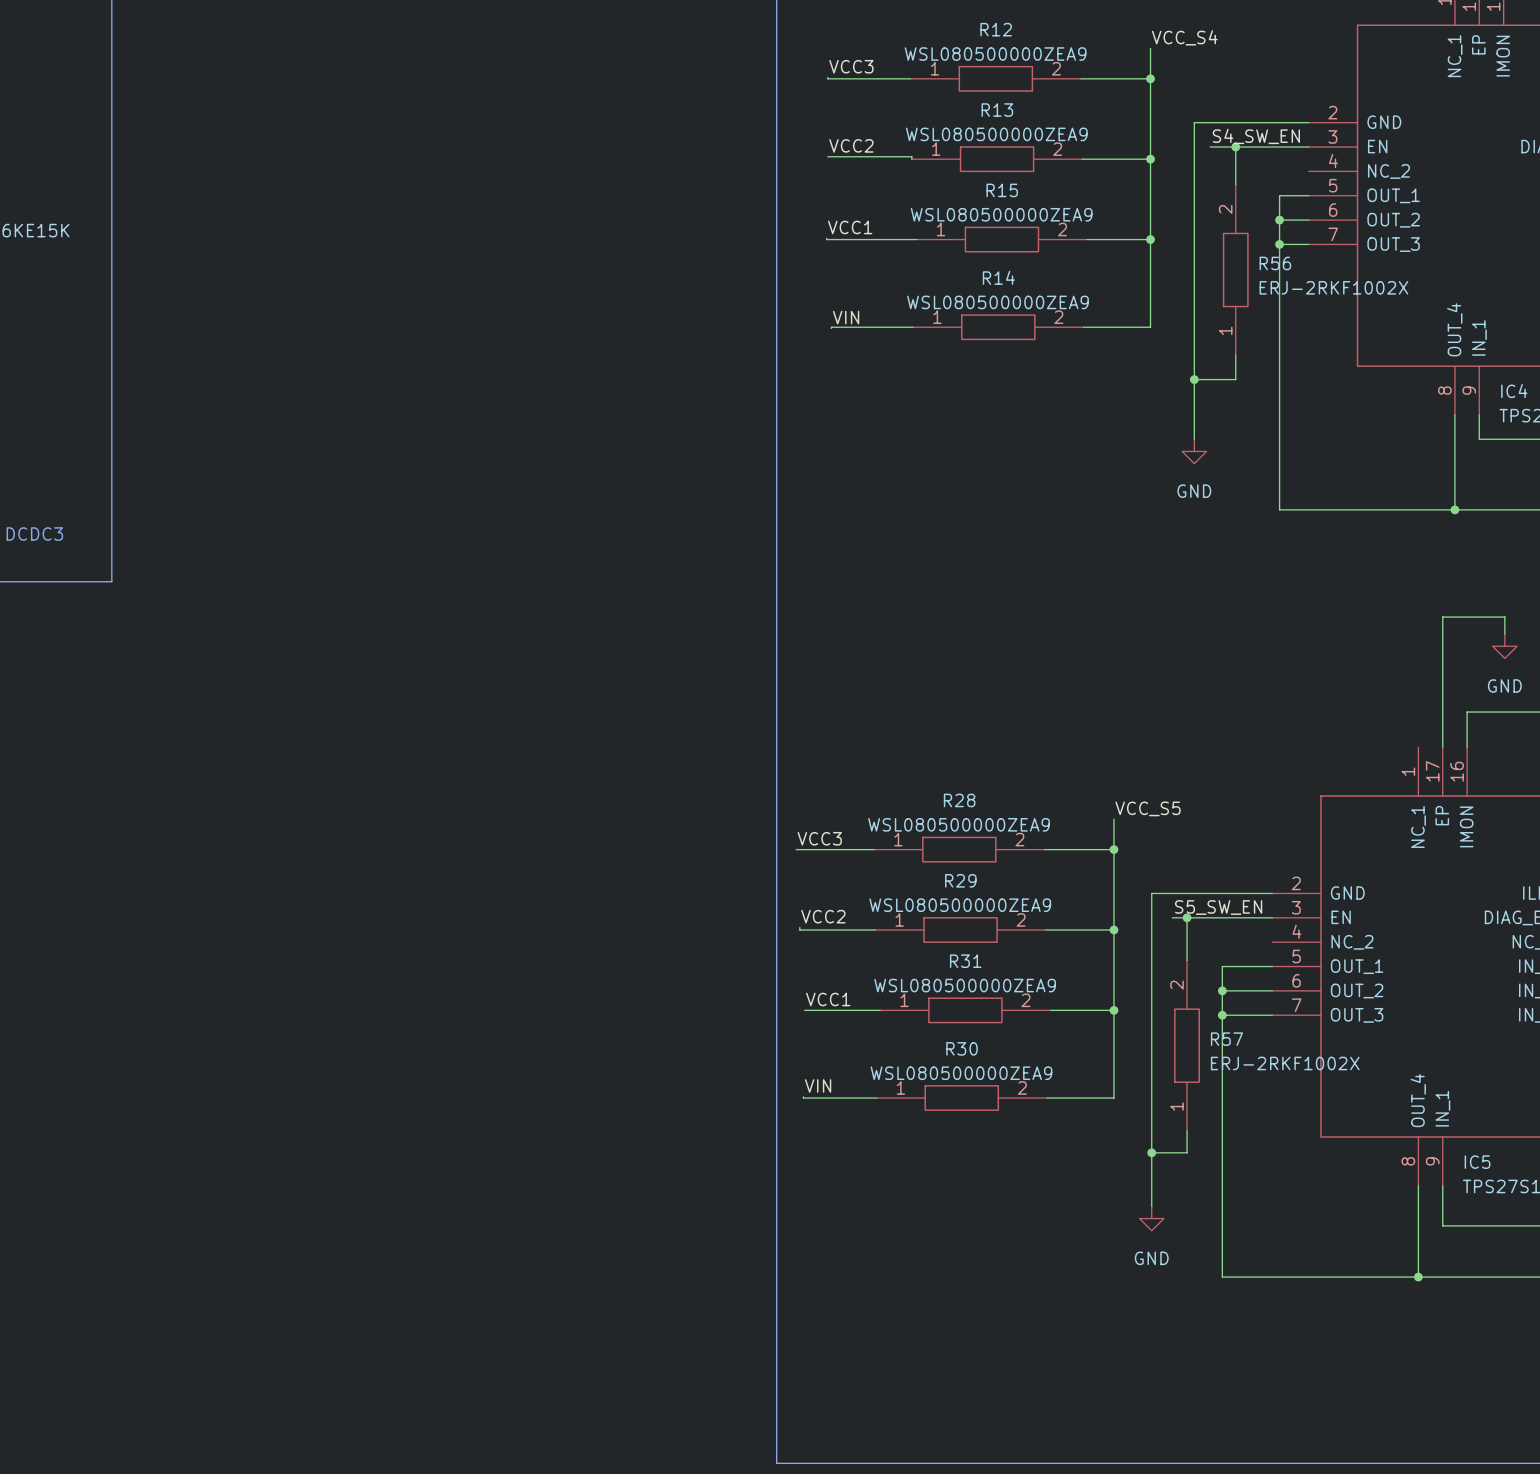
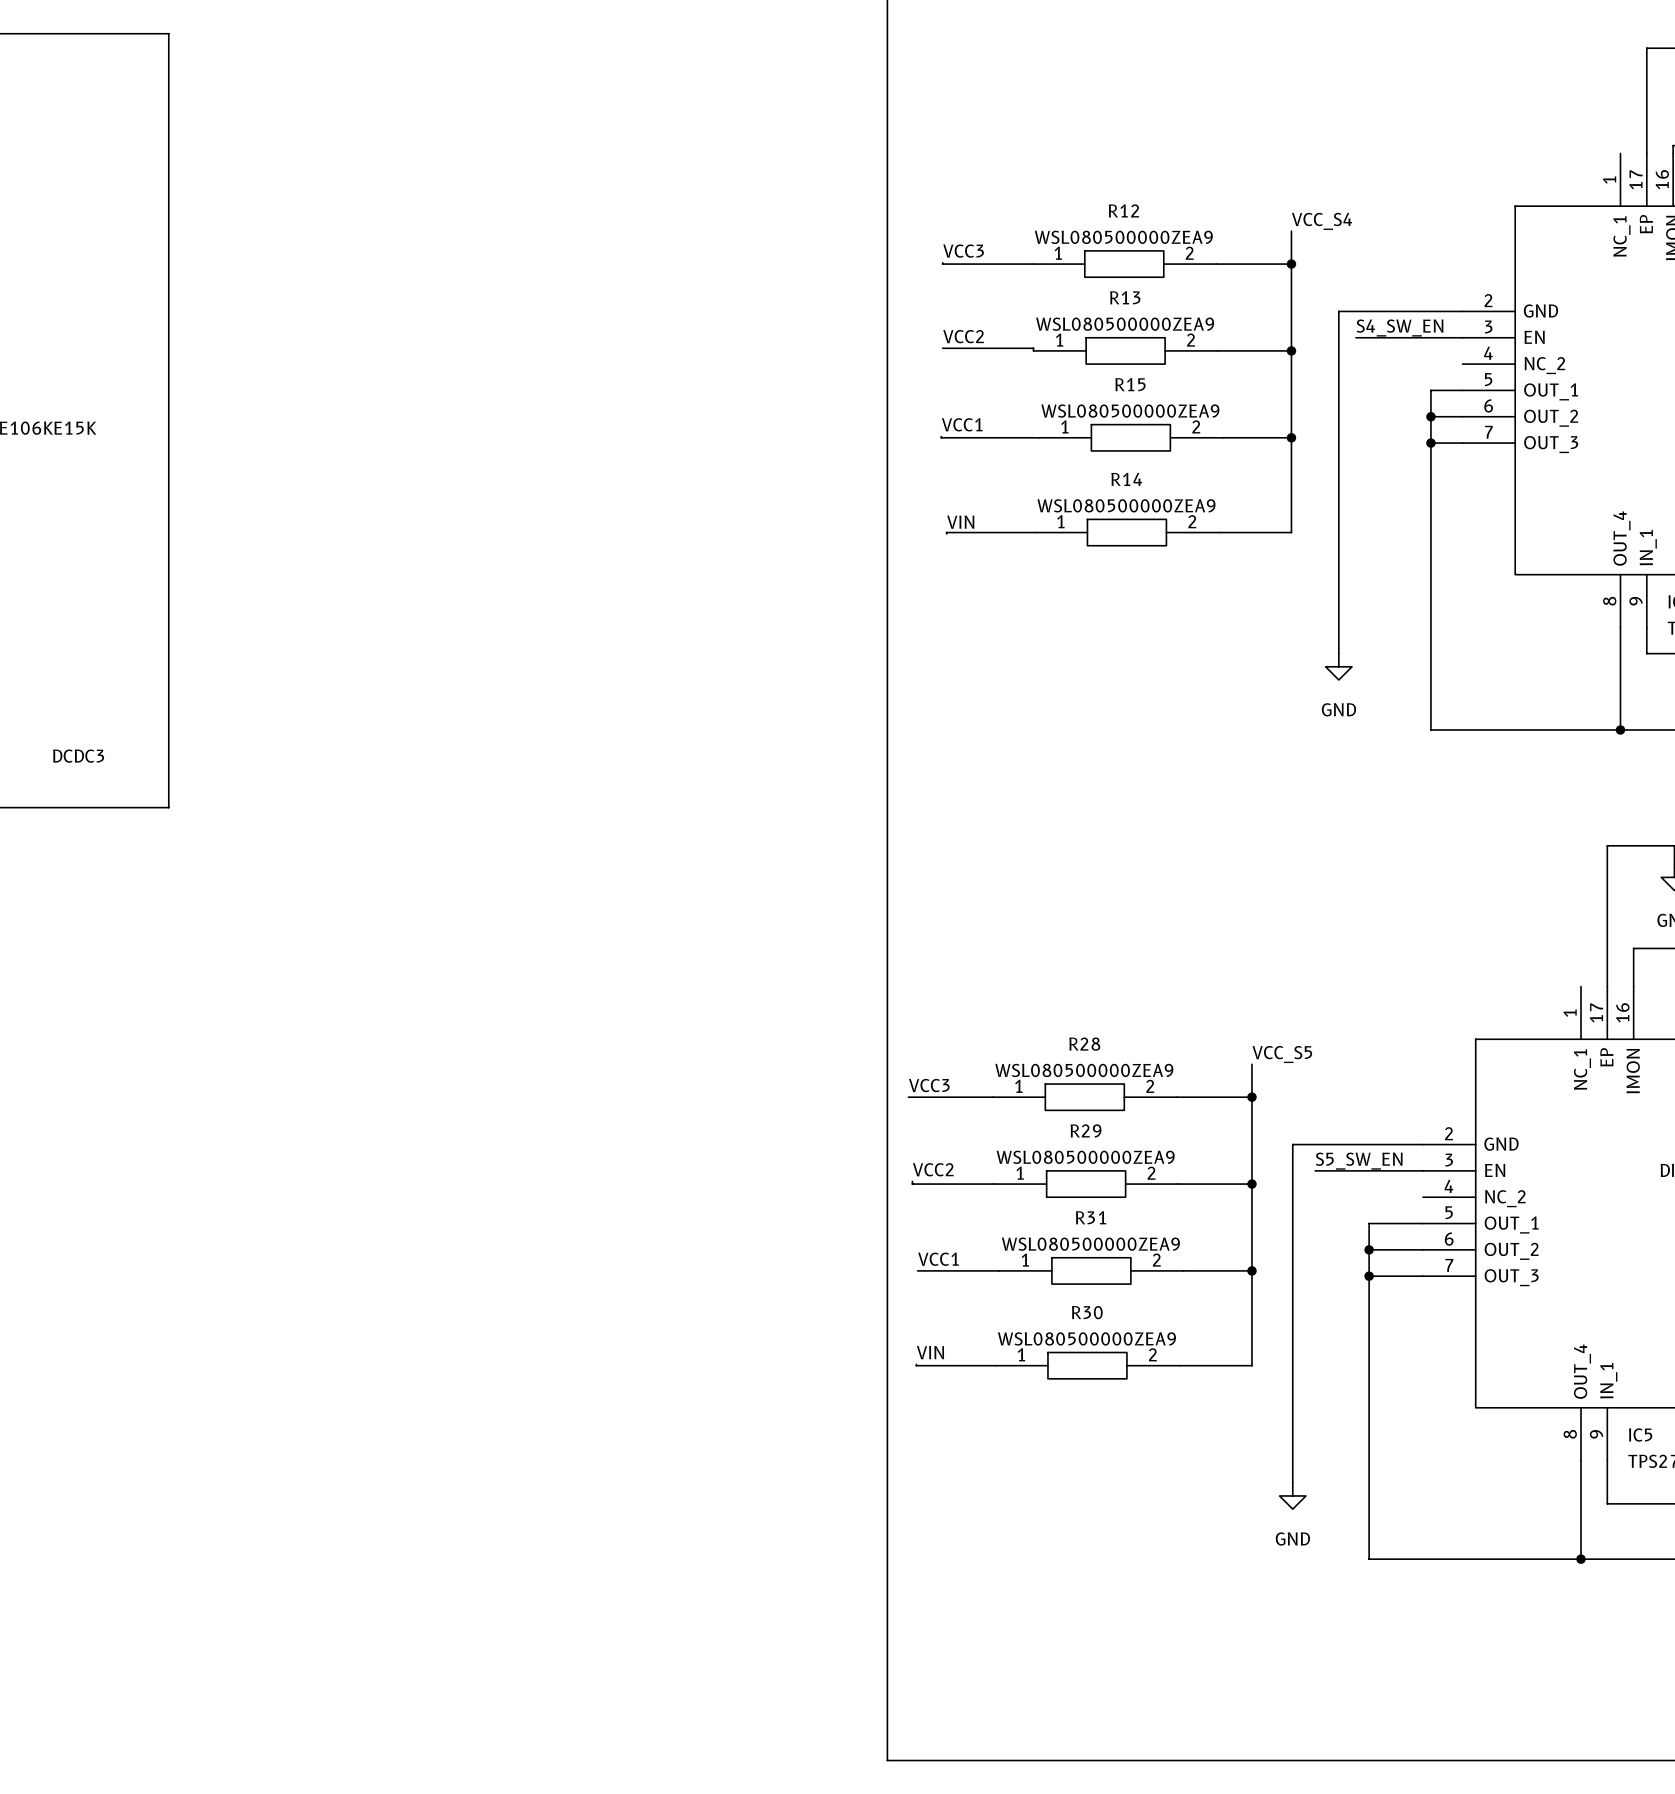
wire: (1235, 147) (1235, 184) -> none
junction: (1235, 147) -> none
R56: ERJ-2RKF1002X (1235, 270) -> none
wire: (1235, 355) (1235, 379) (1194, 379) -> none
junction: (1194, 379) -> none
wire: (1187, 917) (1187, 960) -> none
junction: (1187, 917) -> none
R57: ERJ-2RKF1002X (1187, 1045) -> none
wire: (1187, 1130) (1187, 1152) (1151, 1152) -> none
junction: (1151, 1152) -> none

